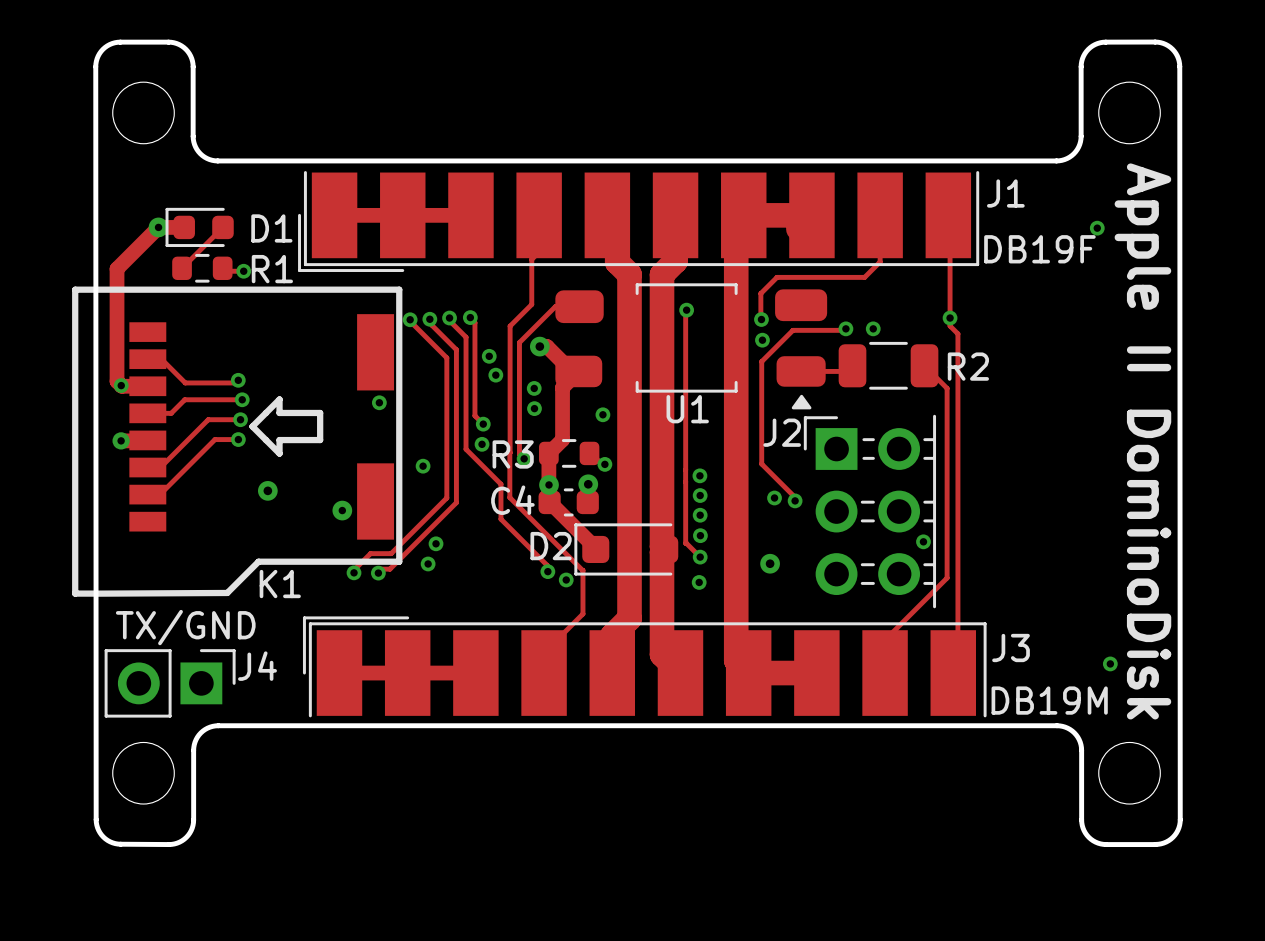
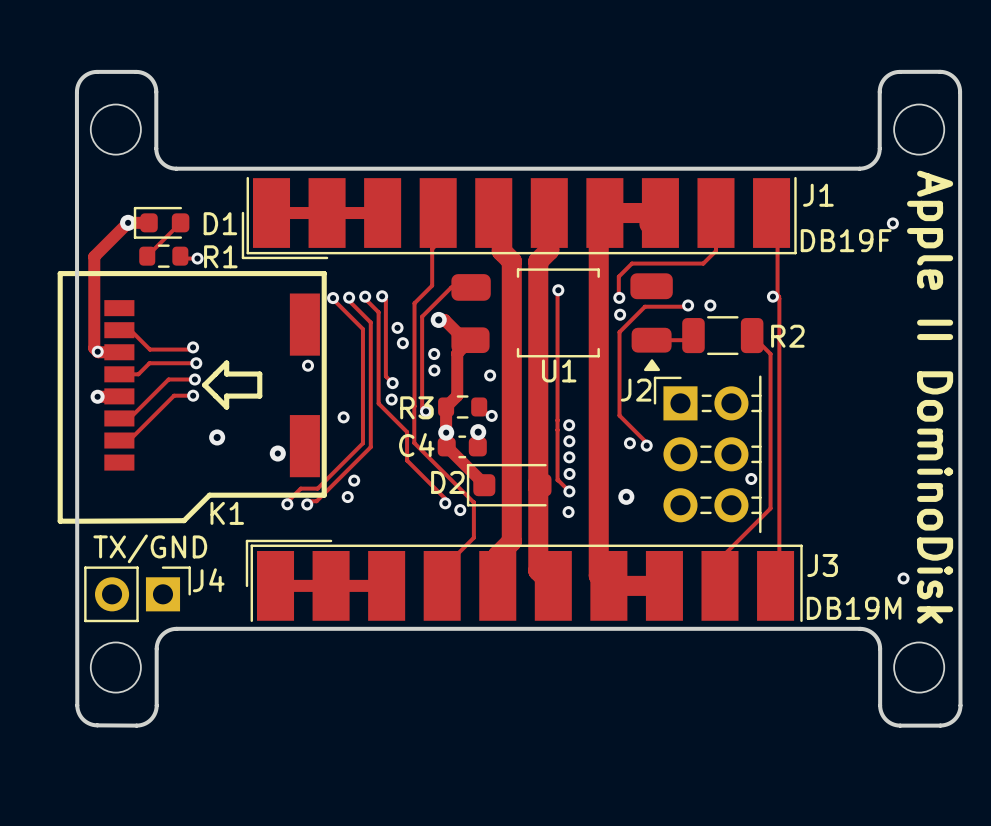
track: (948, 215) (950, 217) (950, 326) (957, 333) -> (777, 245) (779, 309)

